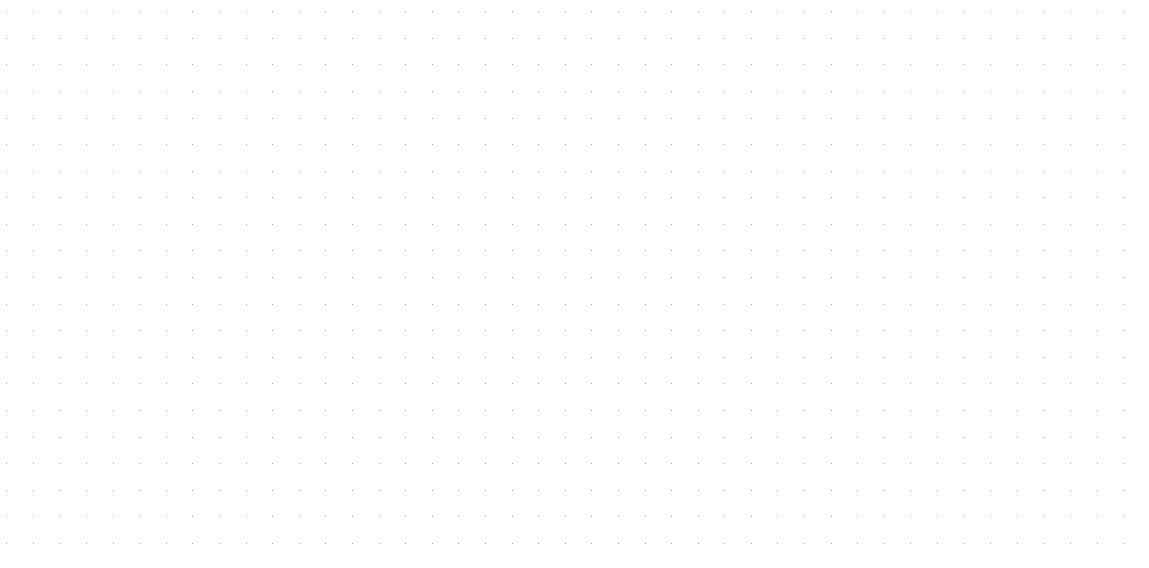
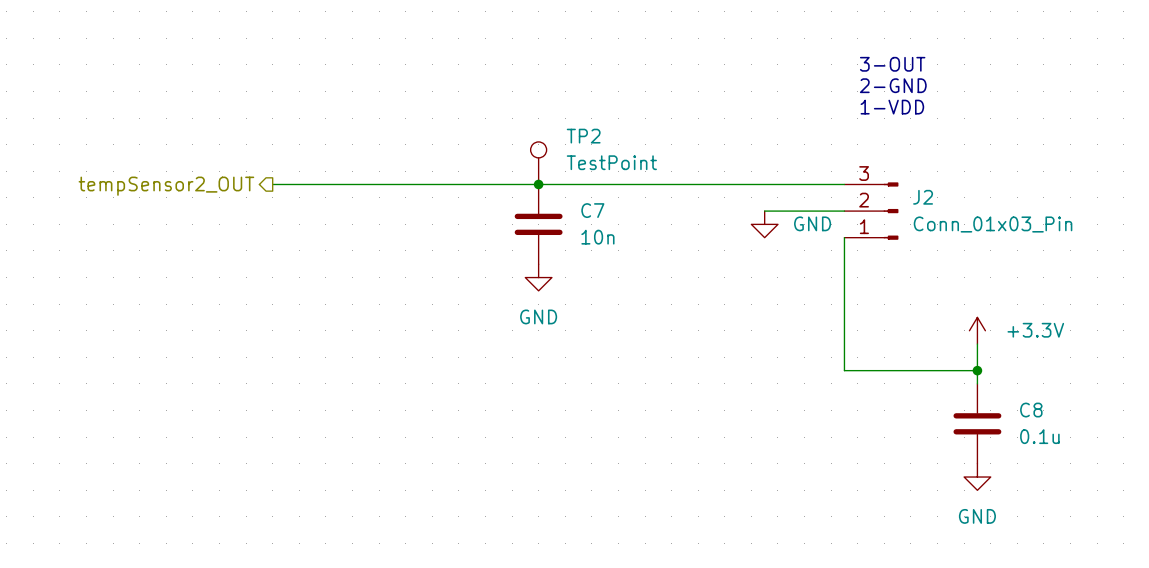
text: none -> 3-OUT (892, 64)
text: none -> 2-GND (893, 85)
text: none -> 1-VDD (892, 107)
TP2: none -> TestPoint (538, 163)
wire: none -> (272, 184) (844, 184)
junction: none -> (538, 184)
hierarchical label: none -> tempSensor2_OUT (166, 186)
wire: none -> (764, 211) (844, 211)
J2: none -> Conn_01x03_Pin (871, 211)
C7: none -> 10n (538, 224)
power symbol: none -> GND (764, 224)
wire: none -> (844, 237) (844, 370) (977, 370)
power symbol: none -> GND (538, 277)
power symbol: none -> +3.3V (977, 330)
wire: none -> (977, 344) (977, 383)
junction: none -> (977, 370)
C8: none -> 0.1u (977, 423)
power symbol: none -> GND (977, 477)

